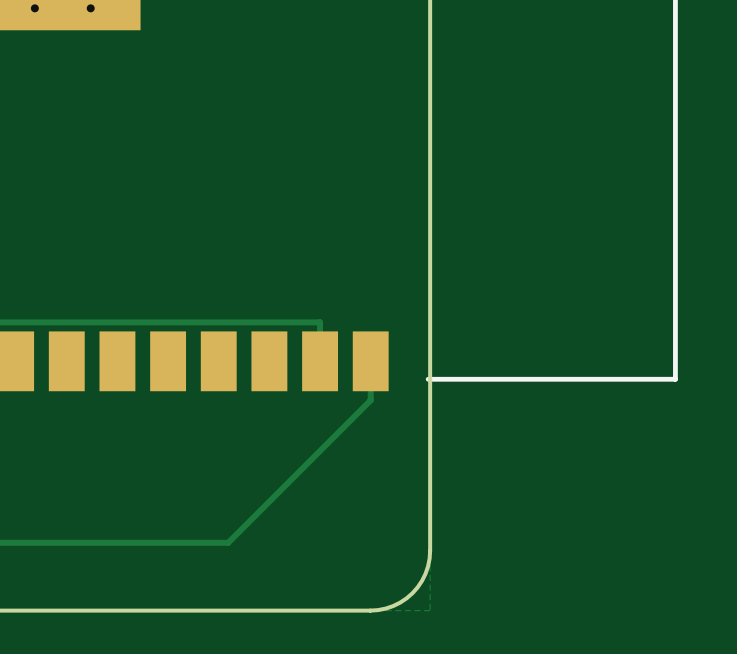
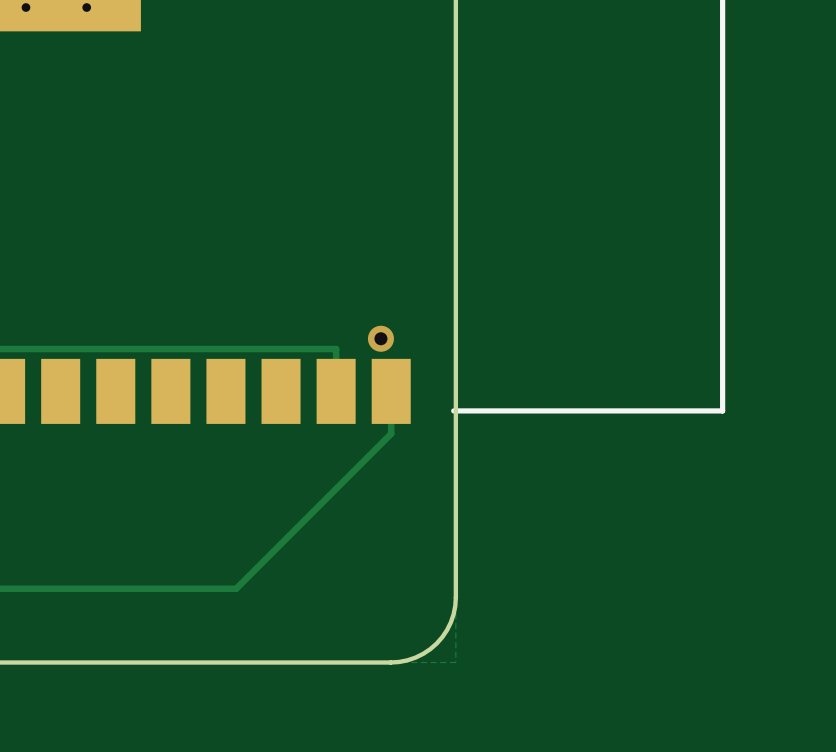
via: none -> (380, 338)

